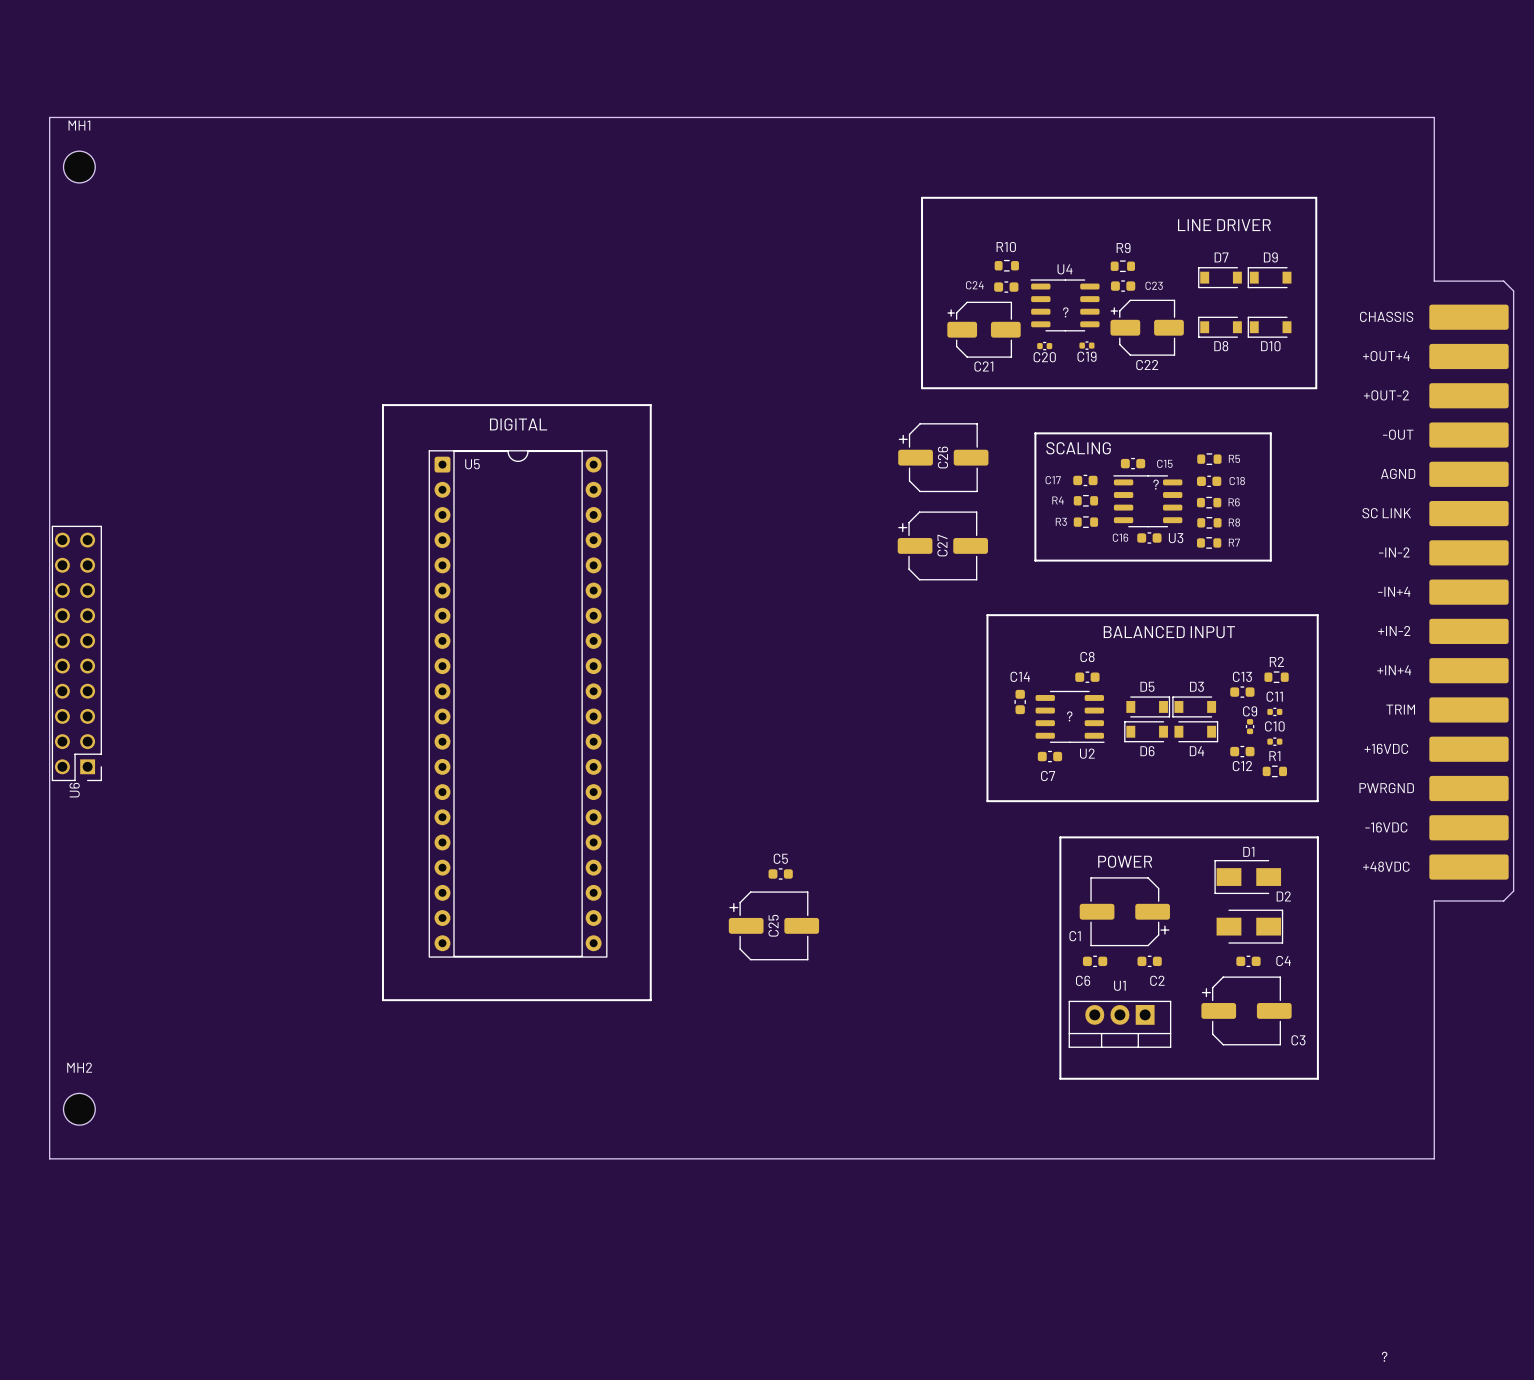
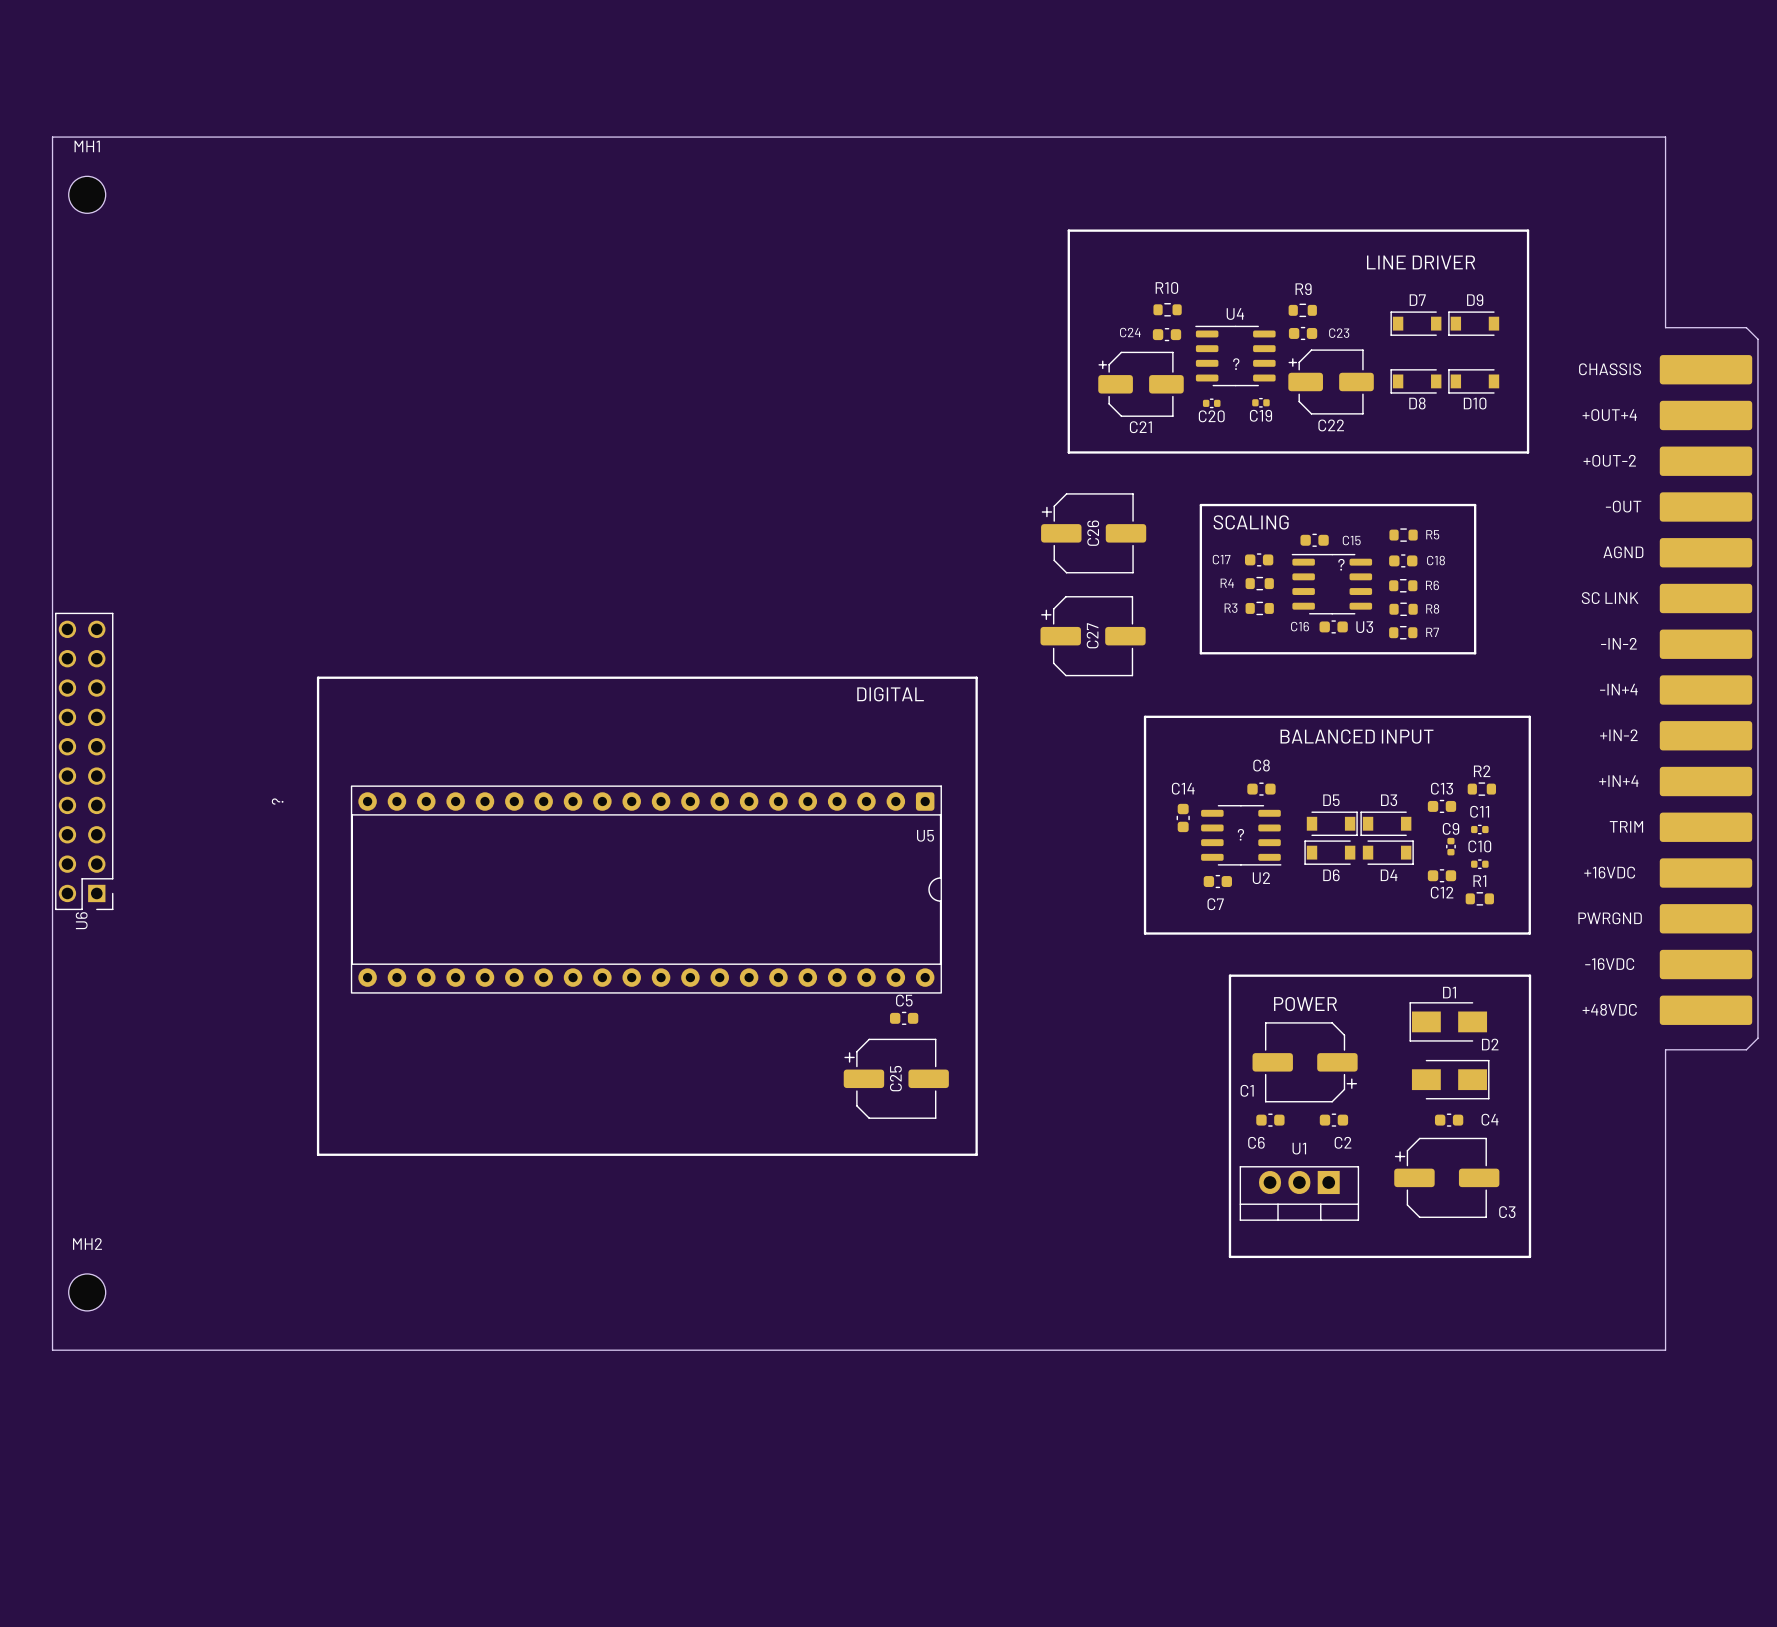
line: (382, 405) (650, 405) (650, 1000) (382, 1000) (382, 405) -> none
text: DIGITAL (518, 424) -> none
line: none -> (318, 677) (976, 677) (976, 1154) (318, 1154) (318, 677)
text: none -> DIGITAL (890, 694)
U5 rotation: 0° (518, 703) -> 90° clockwise (646, 889)
U5 value position: ? (1384, 1356) -> ? (277, 801)

